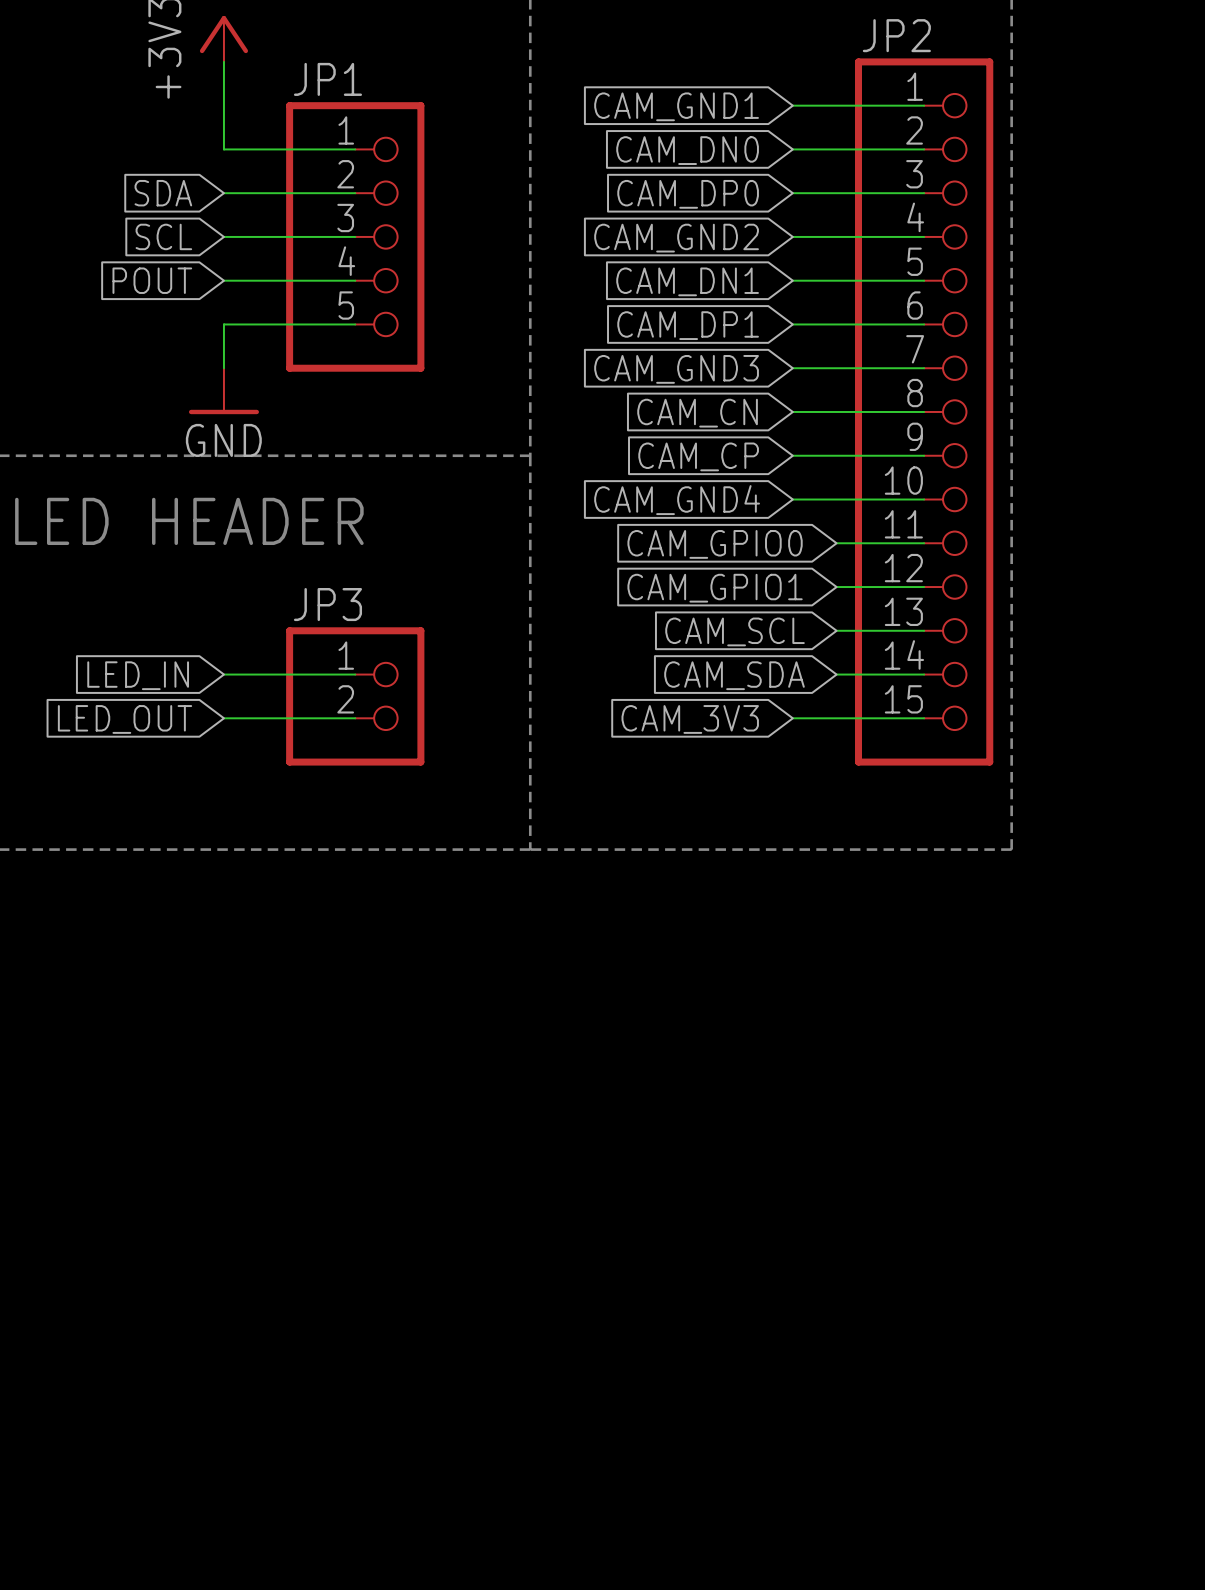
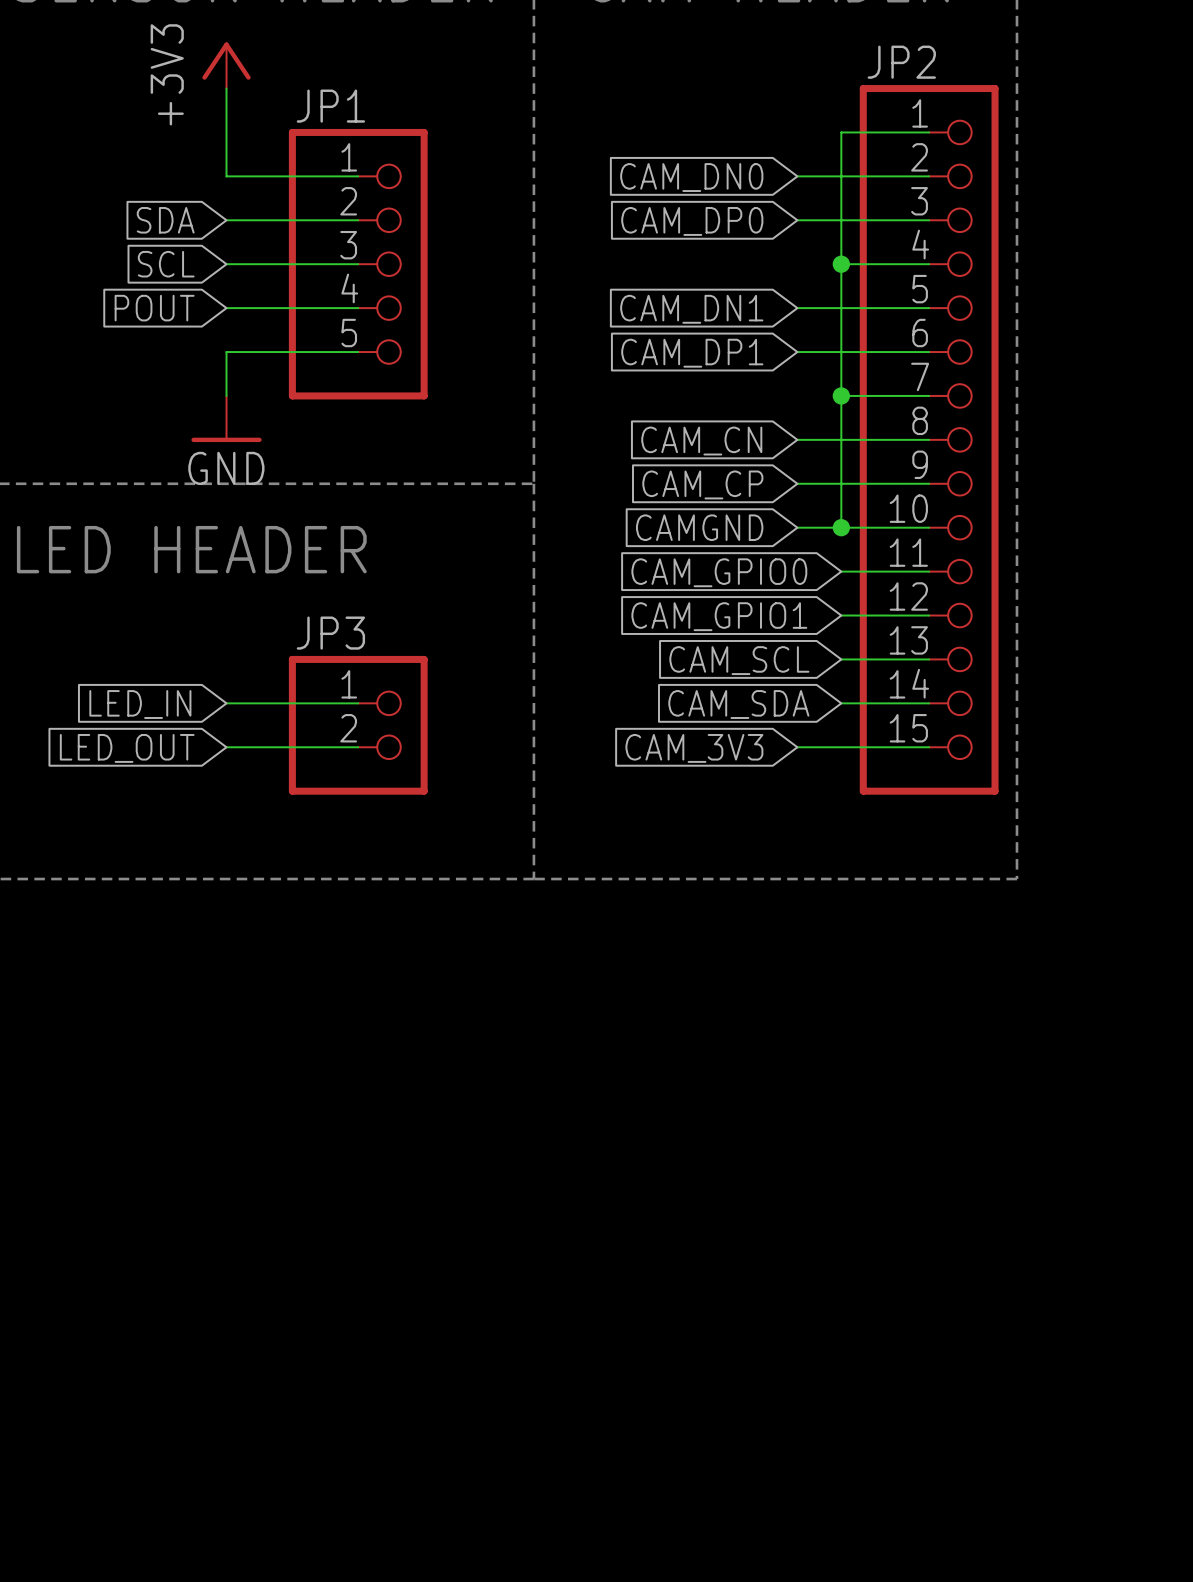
wire: (792, 105) (836, 105) -> (841, 527) (841, 132)
global label: CAM_GND1 (676, 106) -> none
wire: (792, 236) (836, 236) -> none
junction: none -> (841, 264)
global label: CAM_GND2 (676, 238) -> none
wire: (792, 368) (836, 368) -> none
junction: none -> (841, 395)
global label: CAM_GND3 (676, 369) -> none
junction: none -> (841, 527)
global label: CAM_GND4 (677, 500) -> CAMGND (699, 527)

